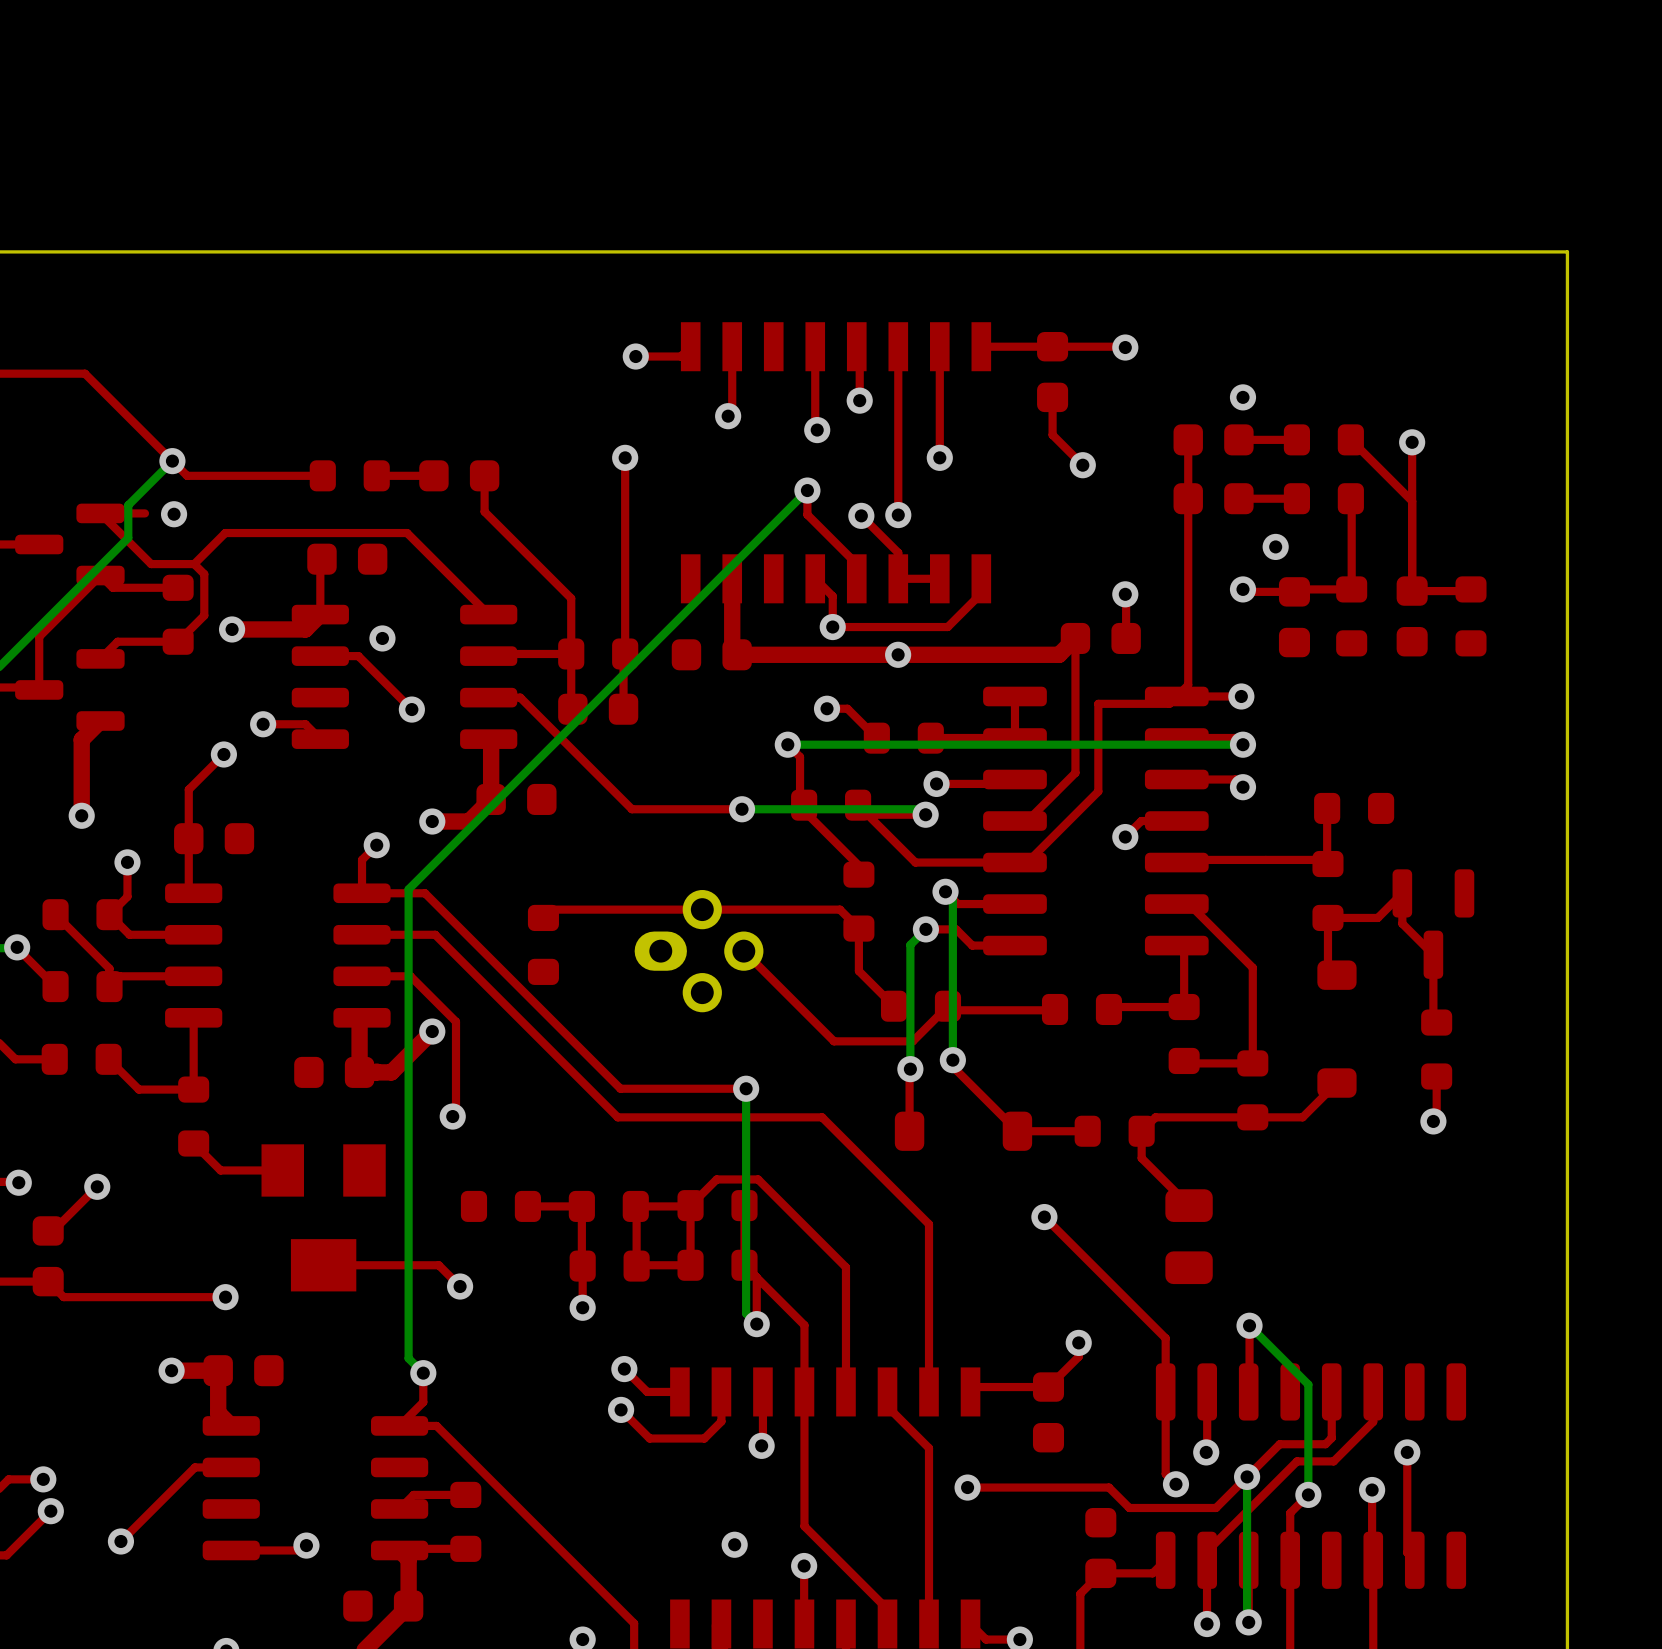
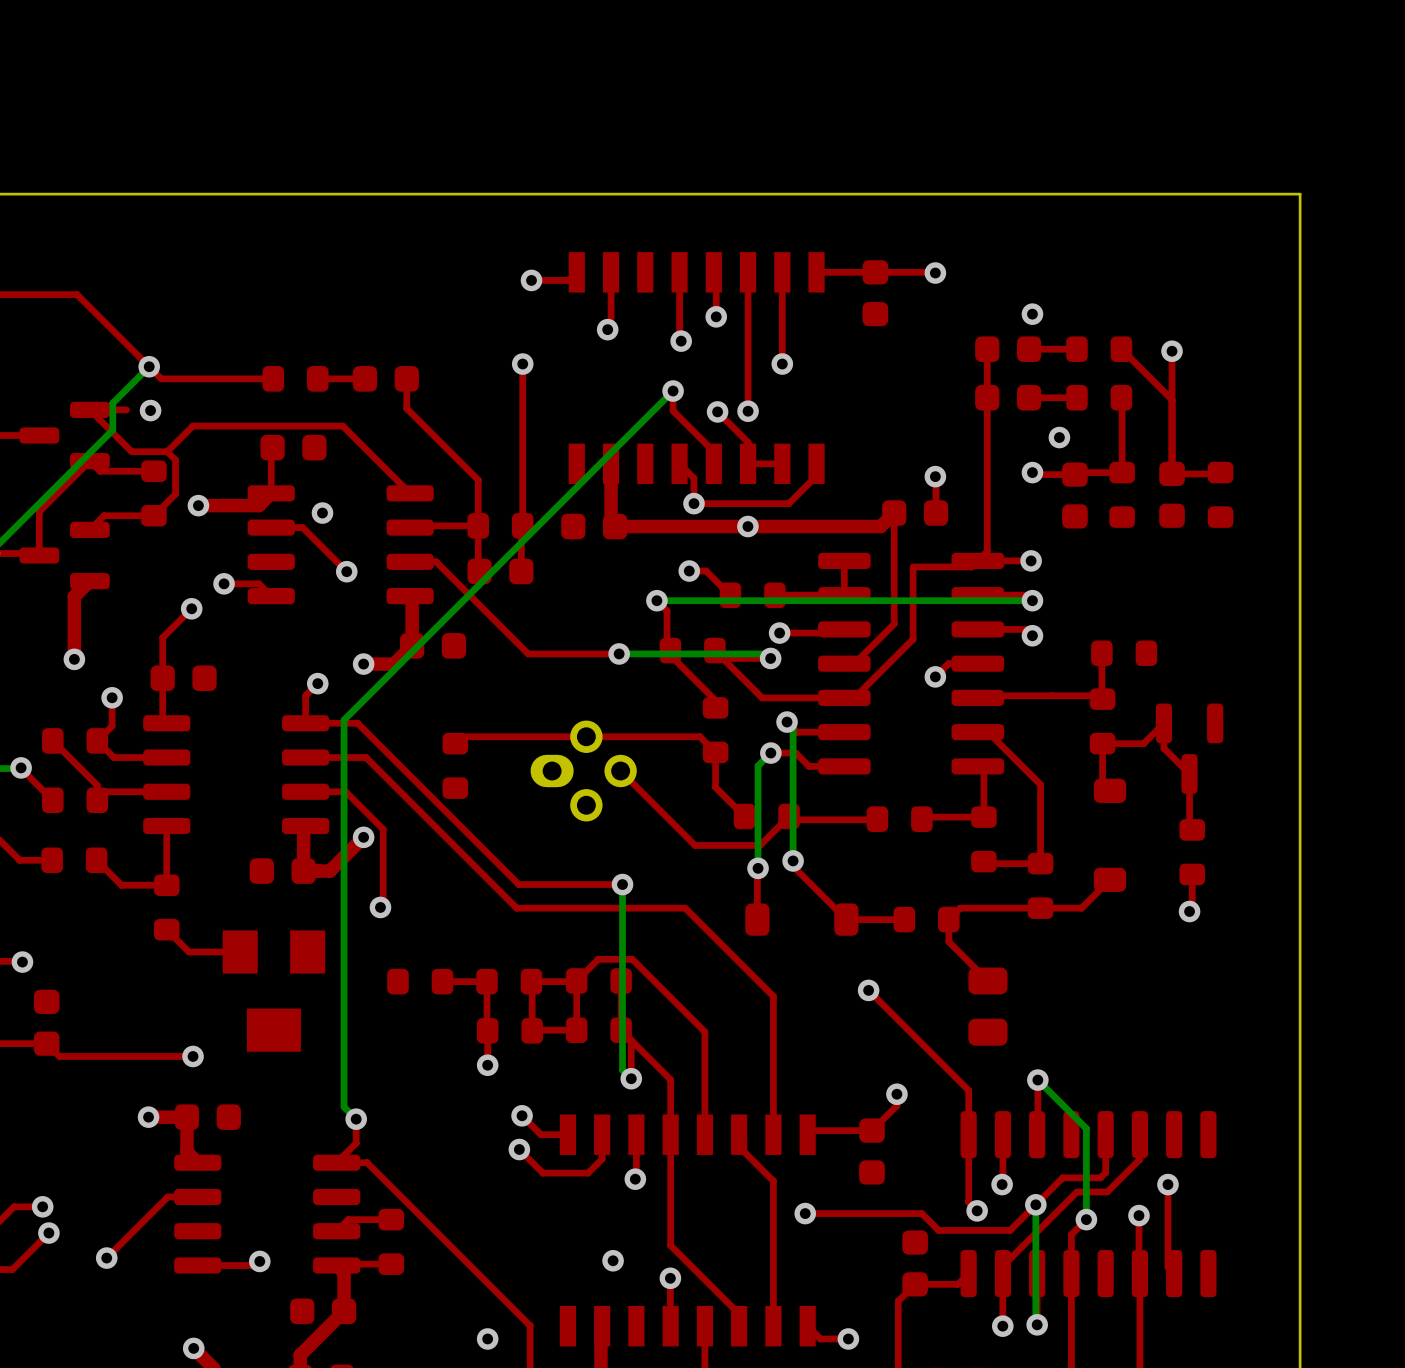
top track: (1052, 397) (1052, 434) (1082, 465) -> none
via: (1082, 465) -> none
top track: (97, 1186) (53, 1230) (48, 1230) -> none
via: (97, 1186) -> none
top track: (323, 1265) (438, 1265) (460, 1286) -> none
via: (460, 1286) -> none

